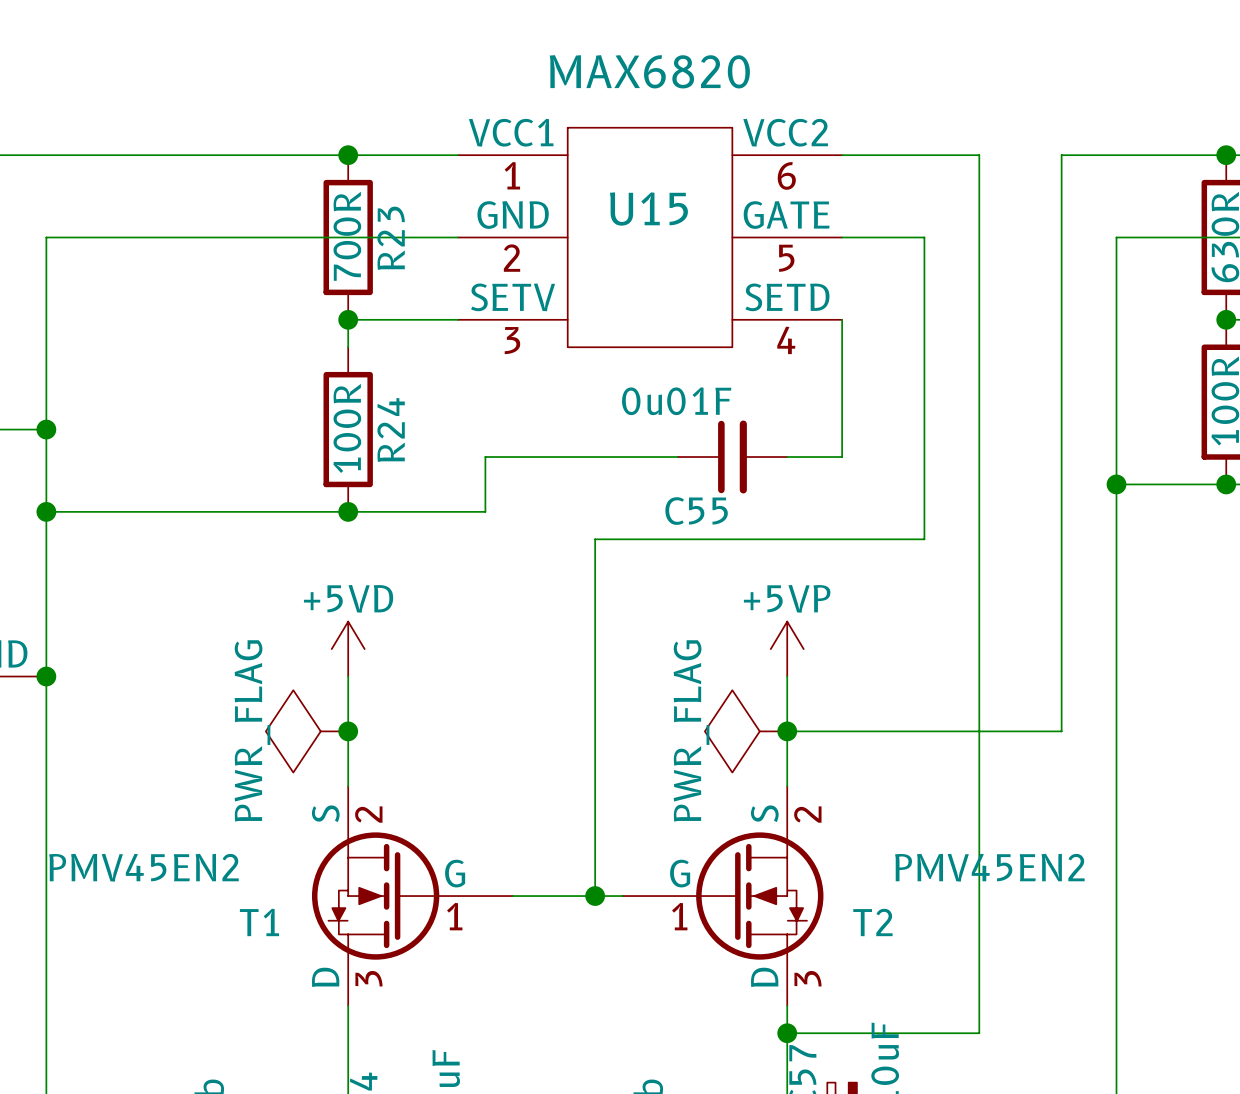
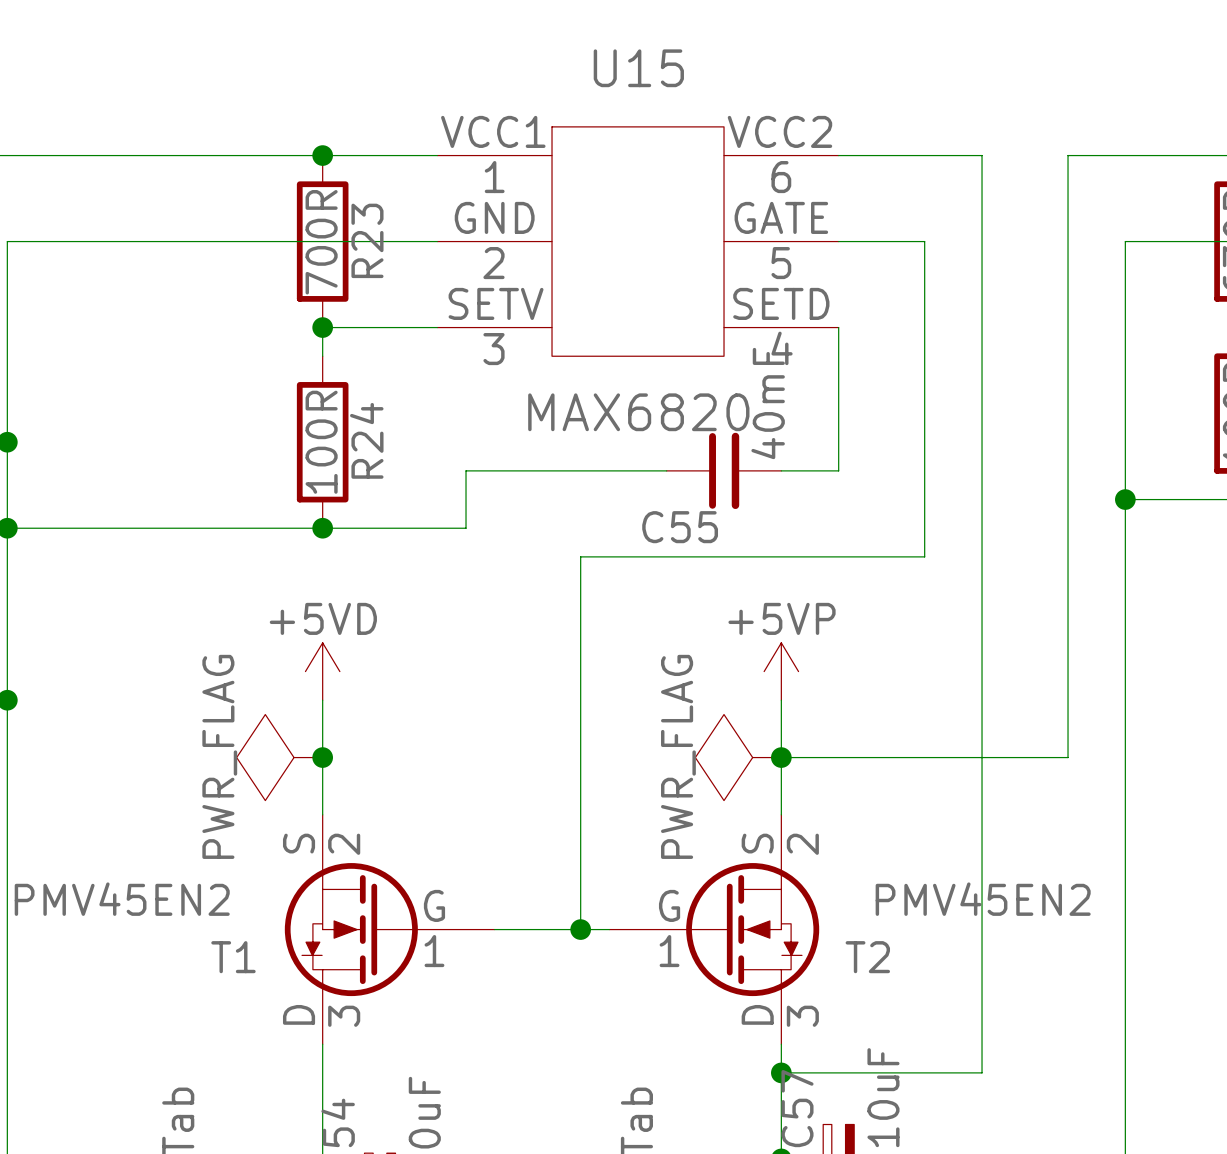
U15 value position: MAX6820 (649, 71) -> MAX6820 (638, 412)
U15 name position: U15 (648, 209) -> U15 (638, 68)
C55 value: 0u01F (676, 401) -> 40mF (768, 403)

